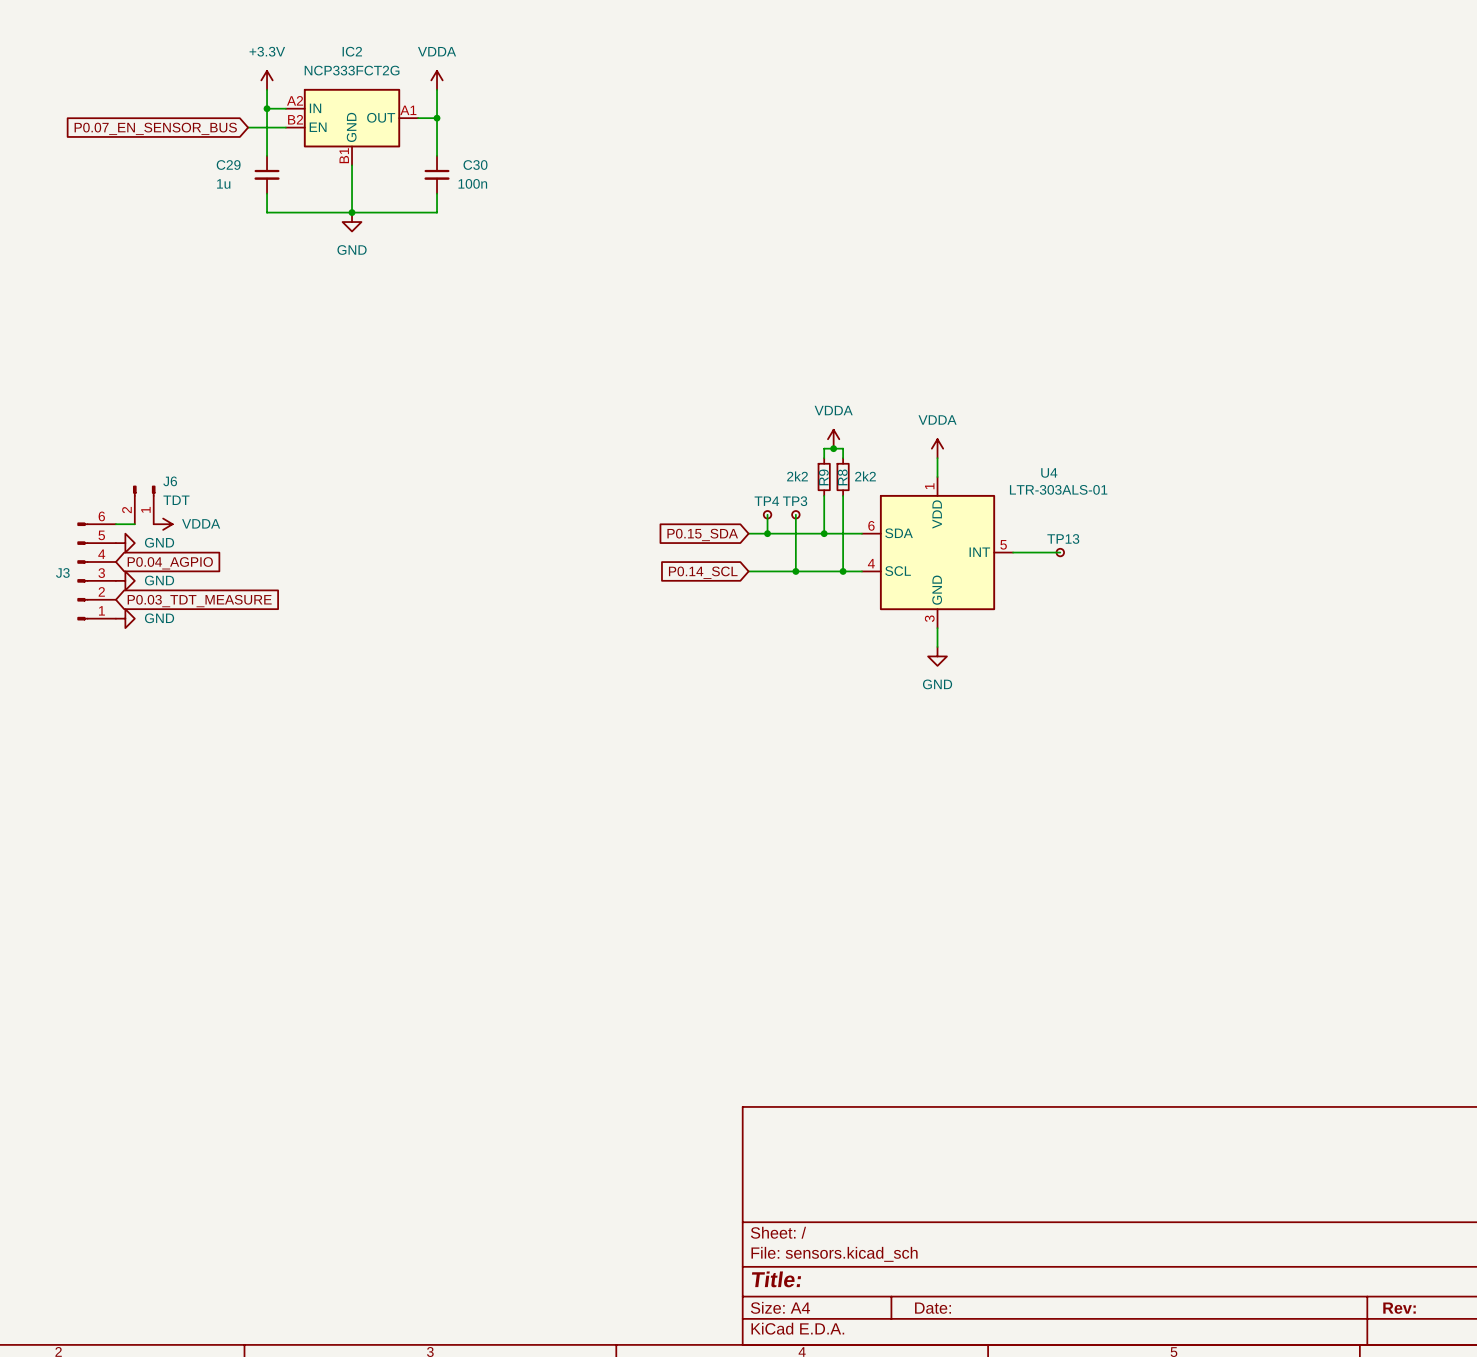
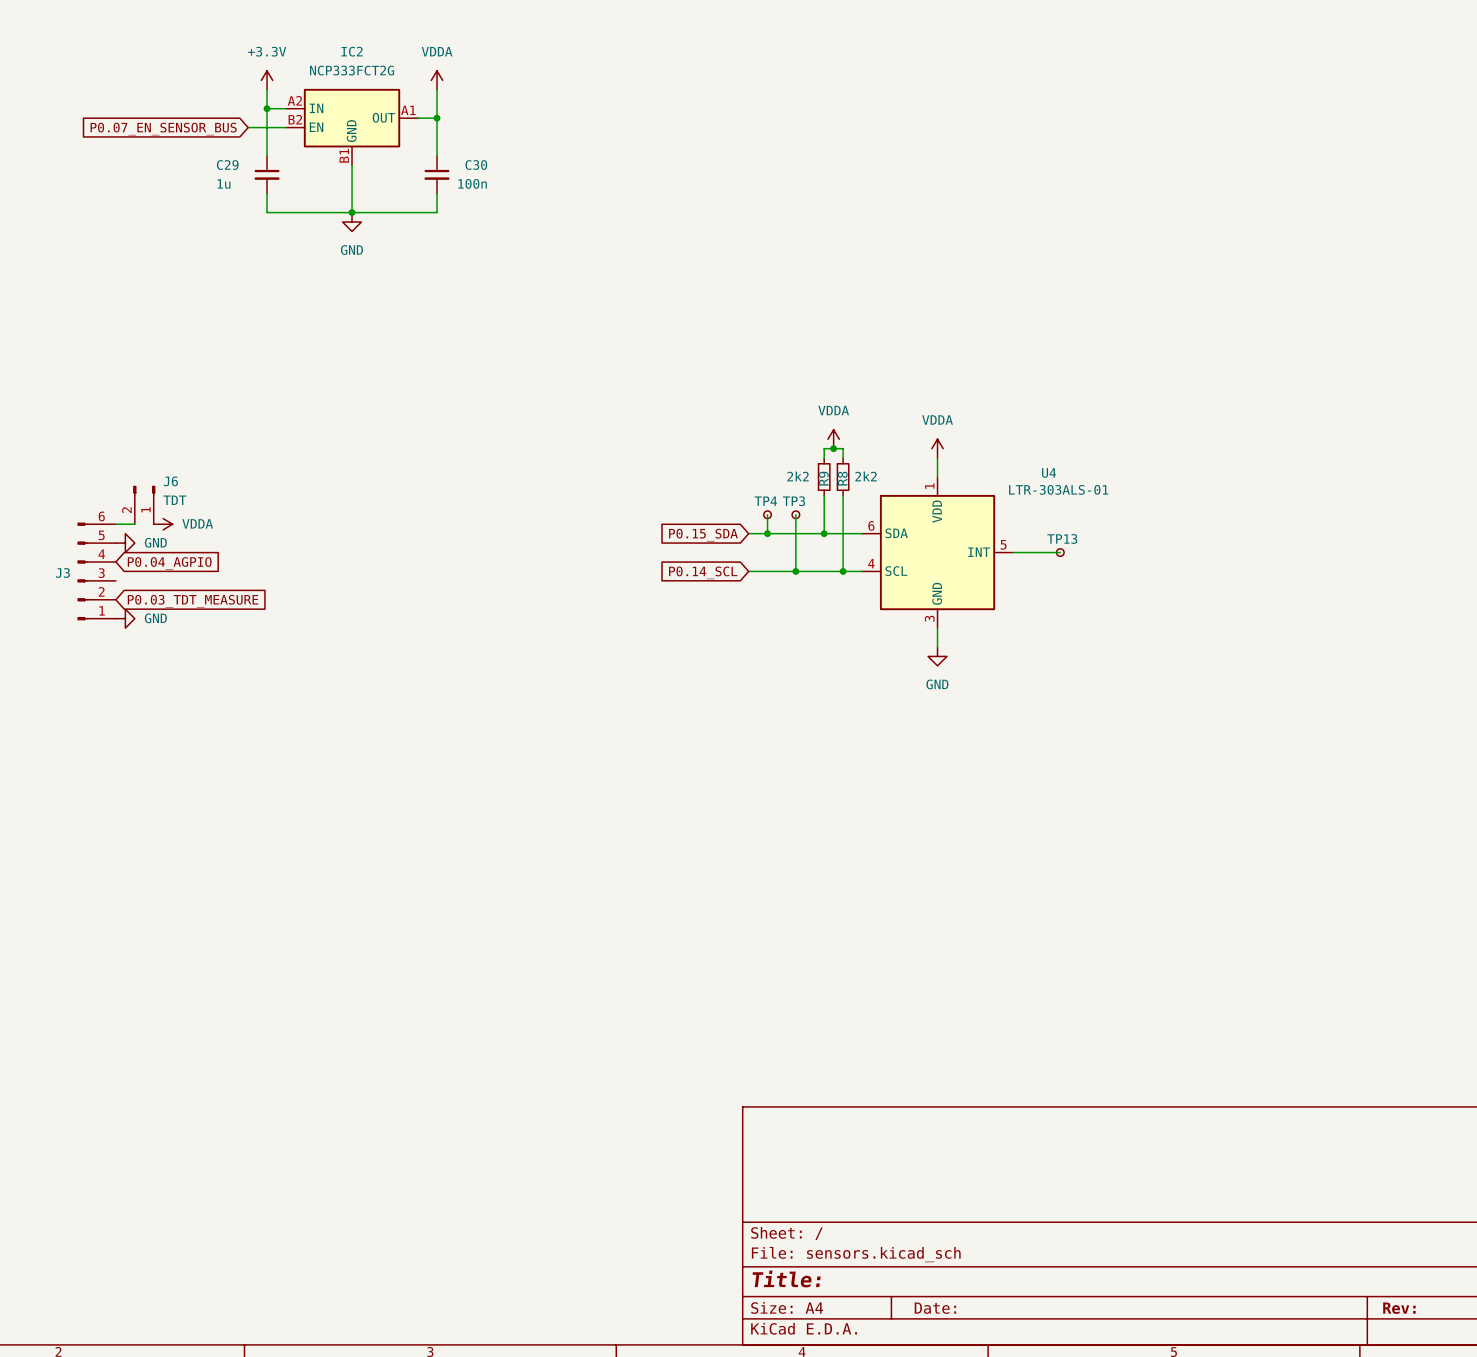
power symbol: GND (125, 580) -> none

